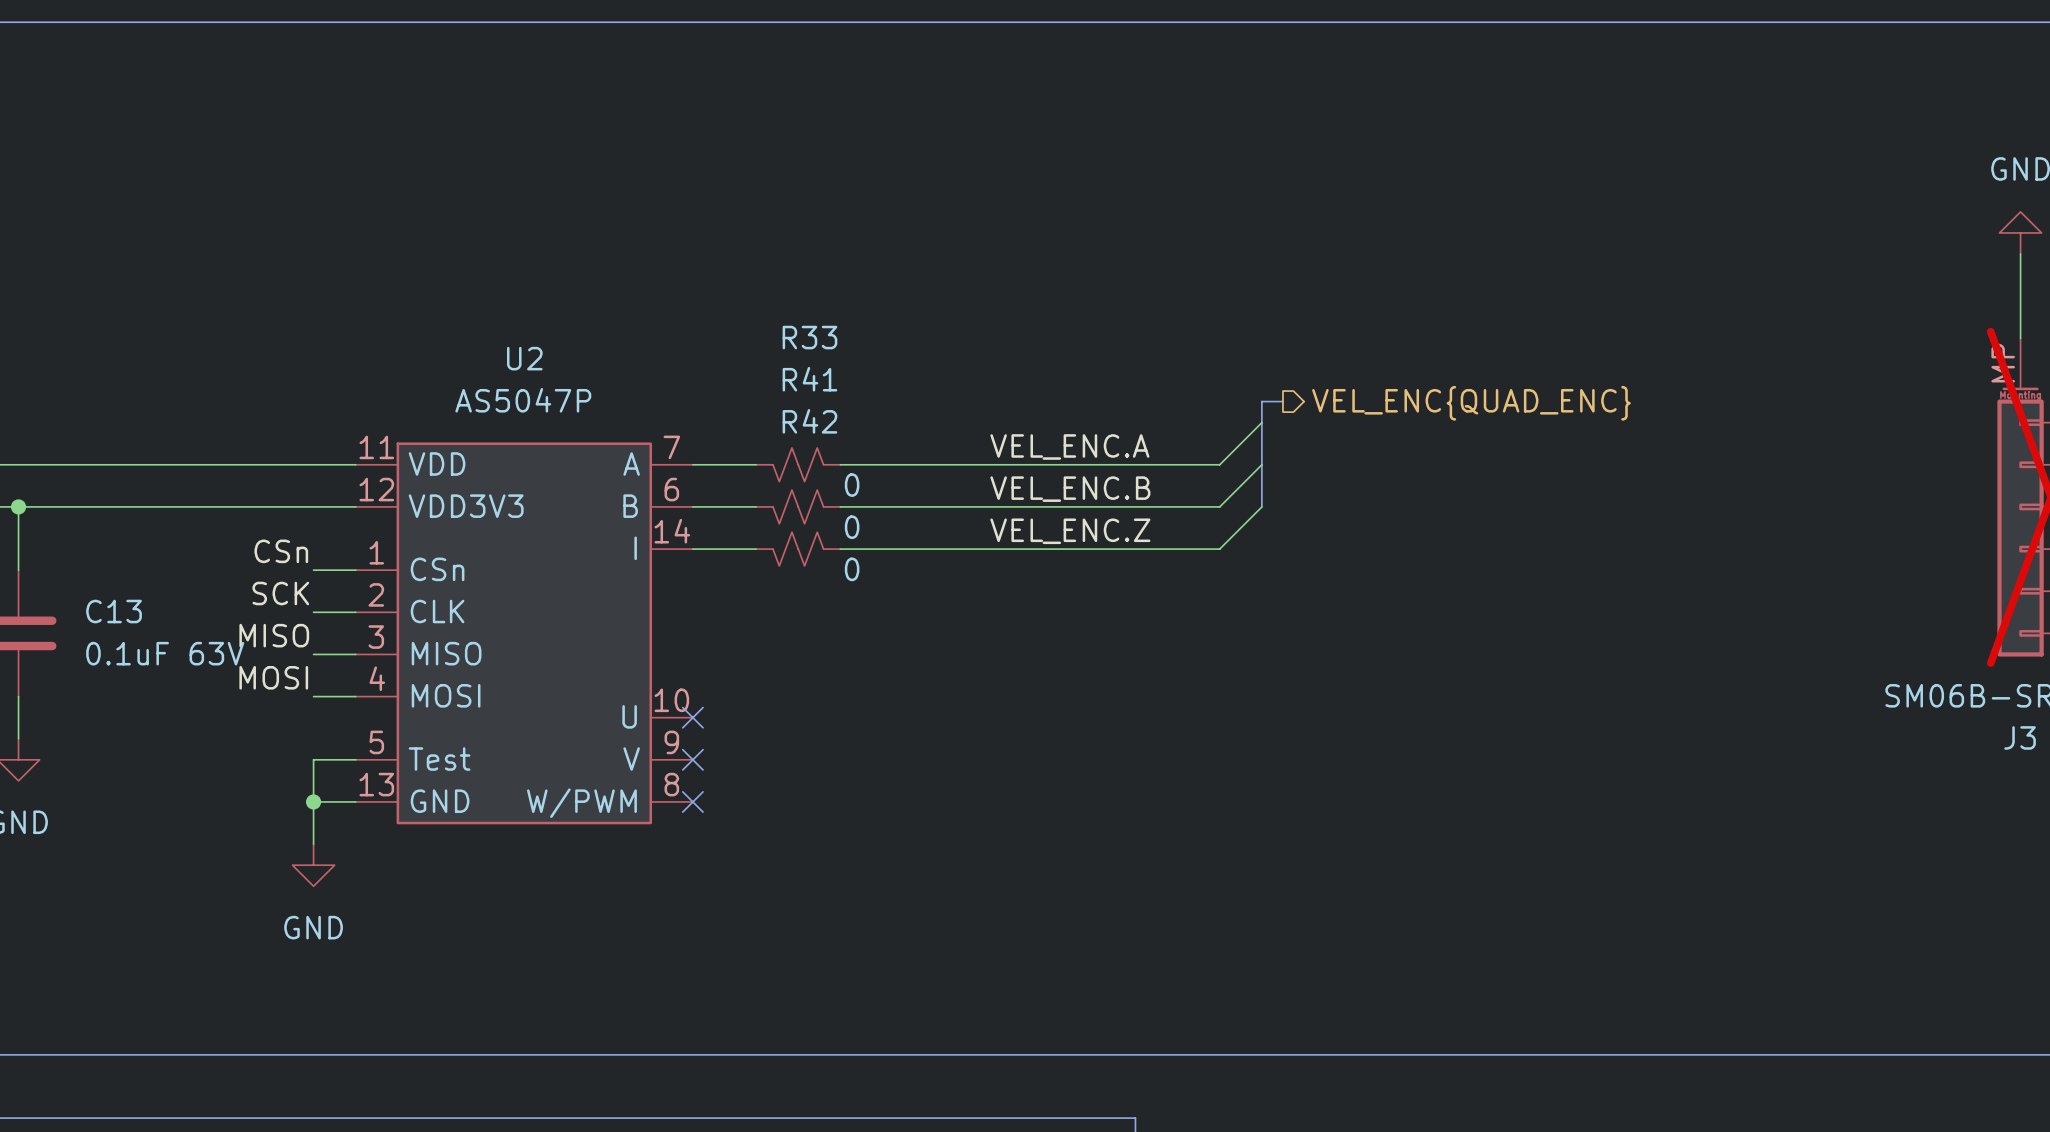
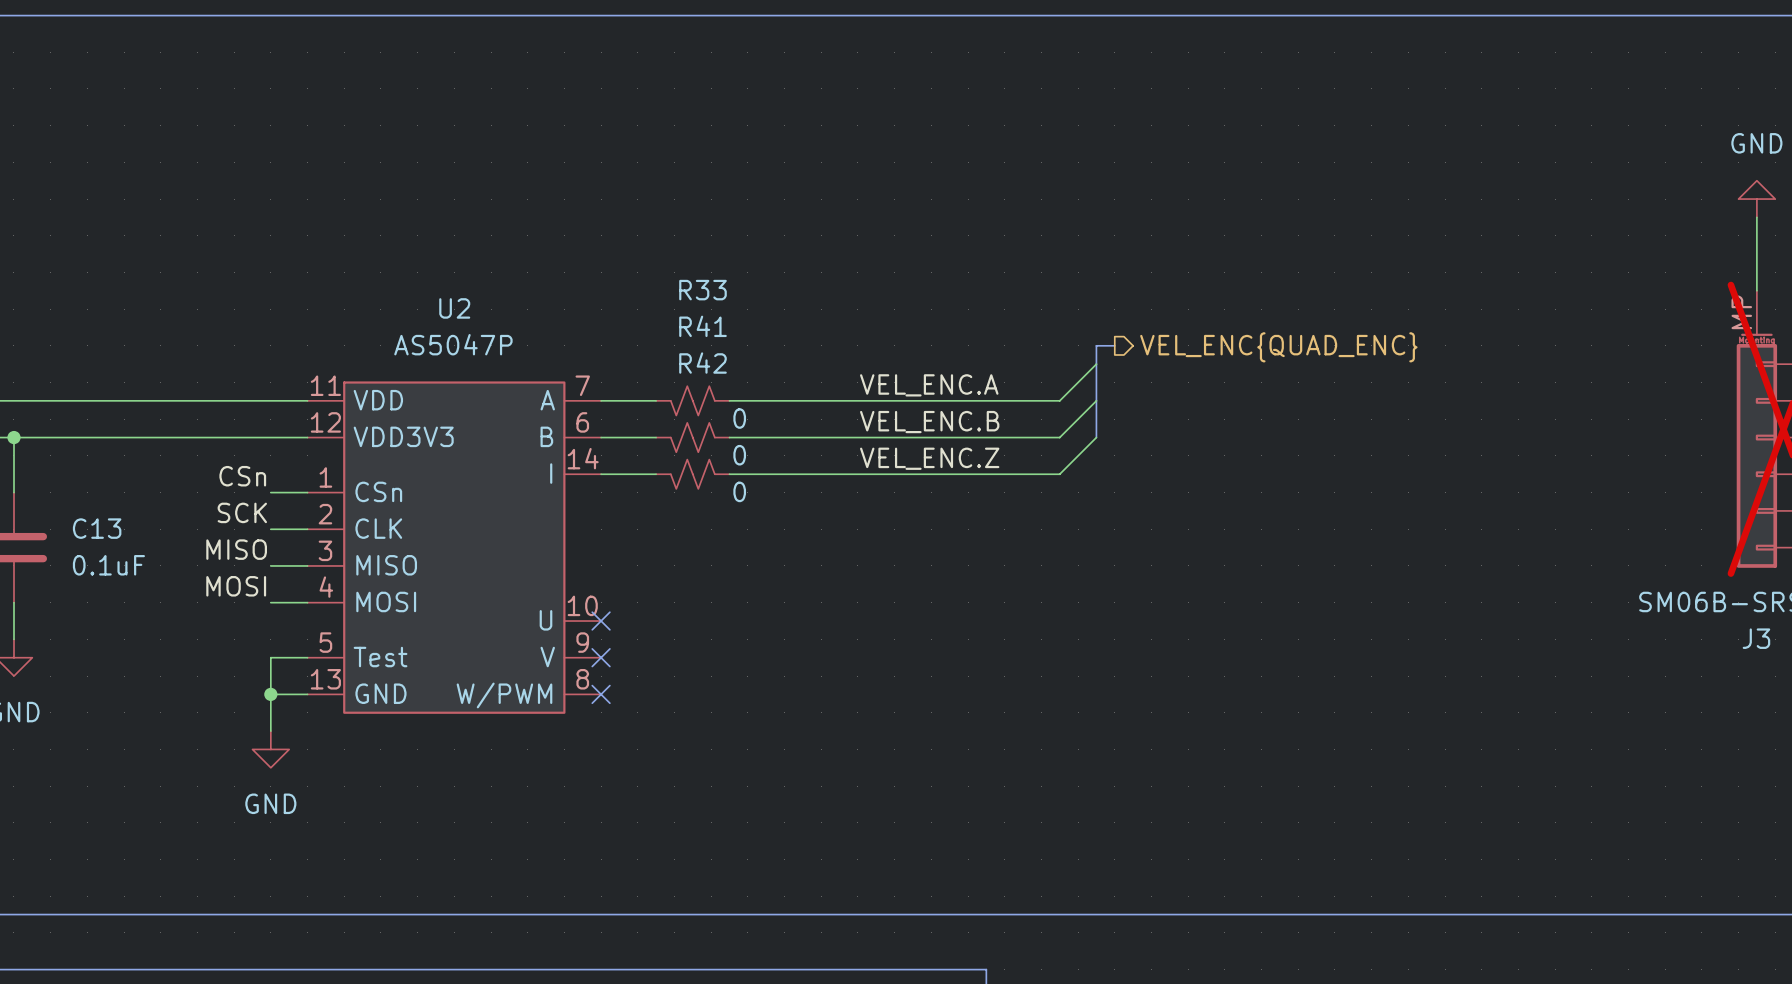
C13 value: 0.1uF 63V (165, 653) -> 0.1uF (108, 565)

